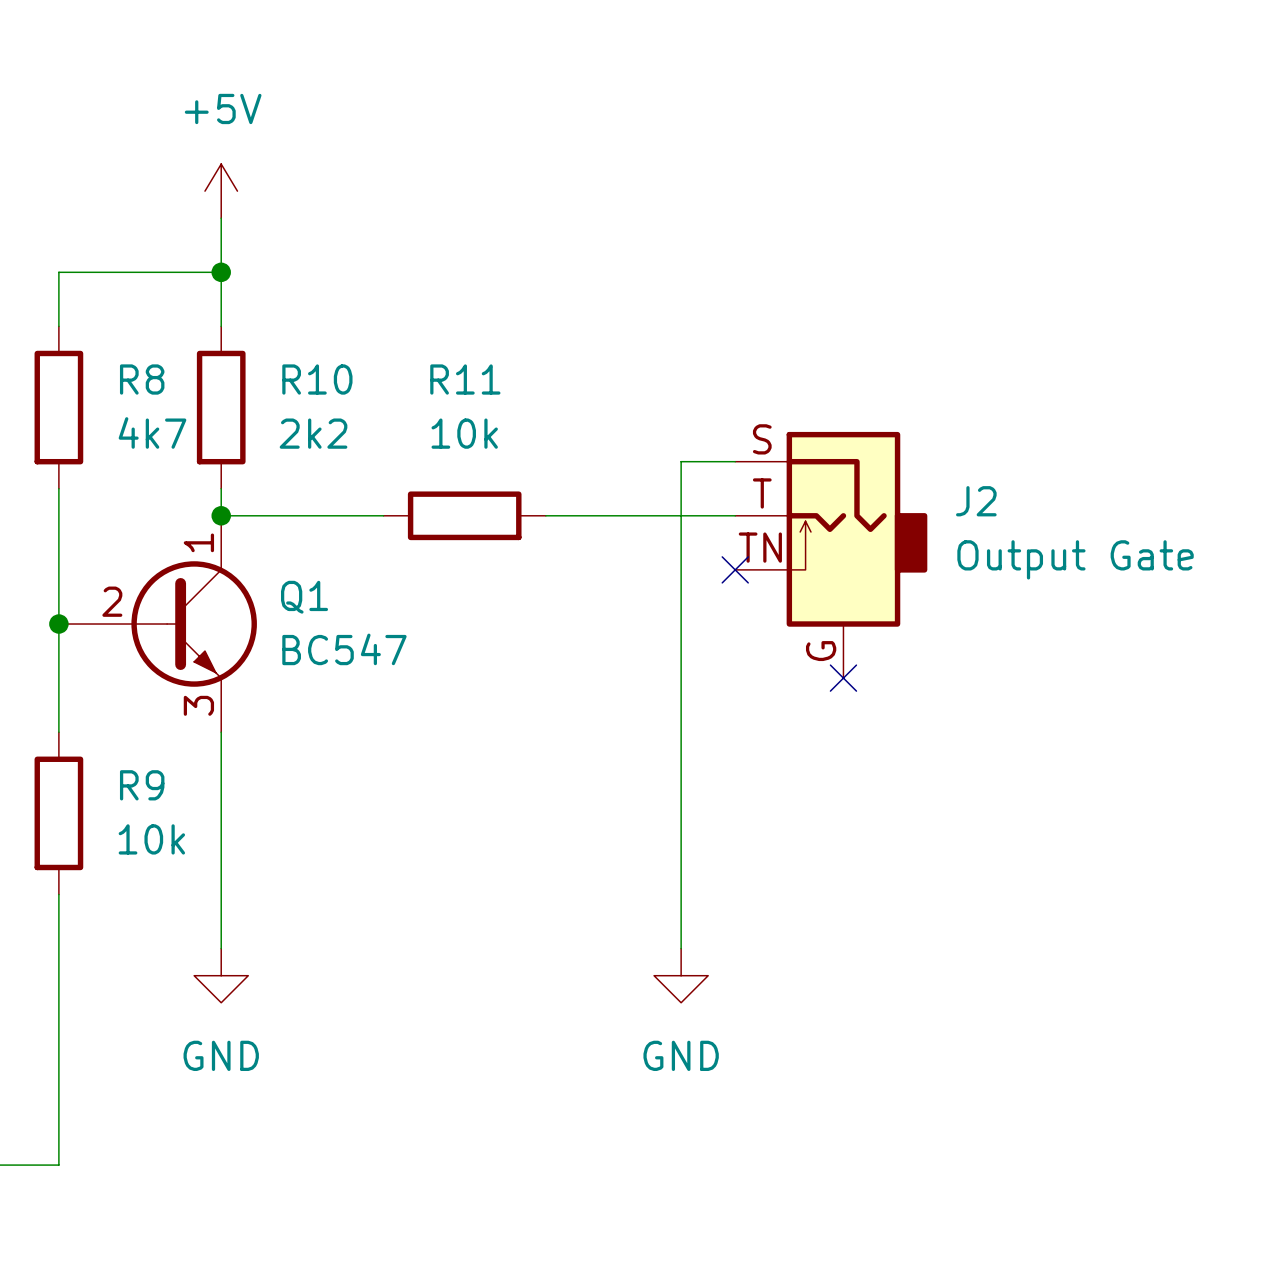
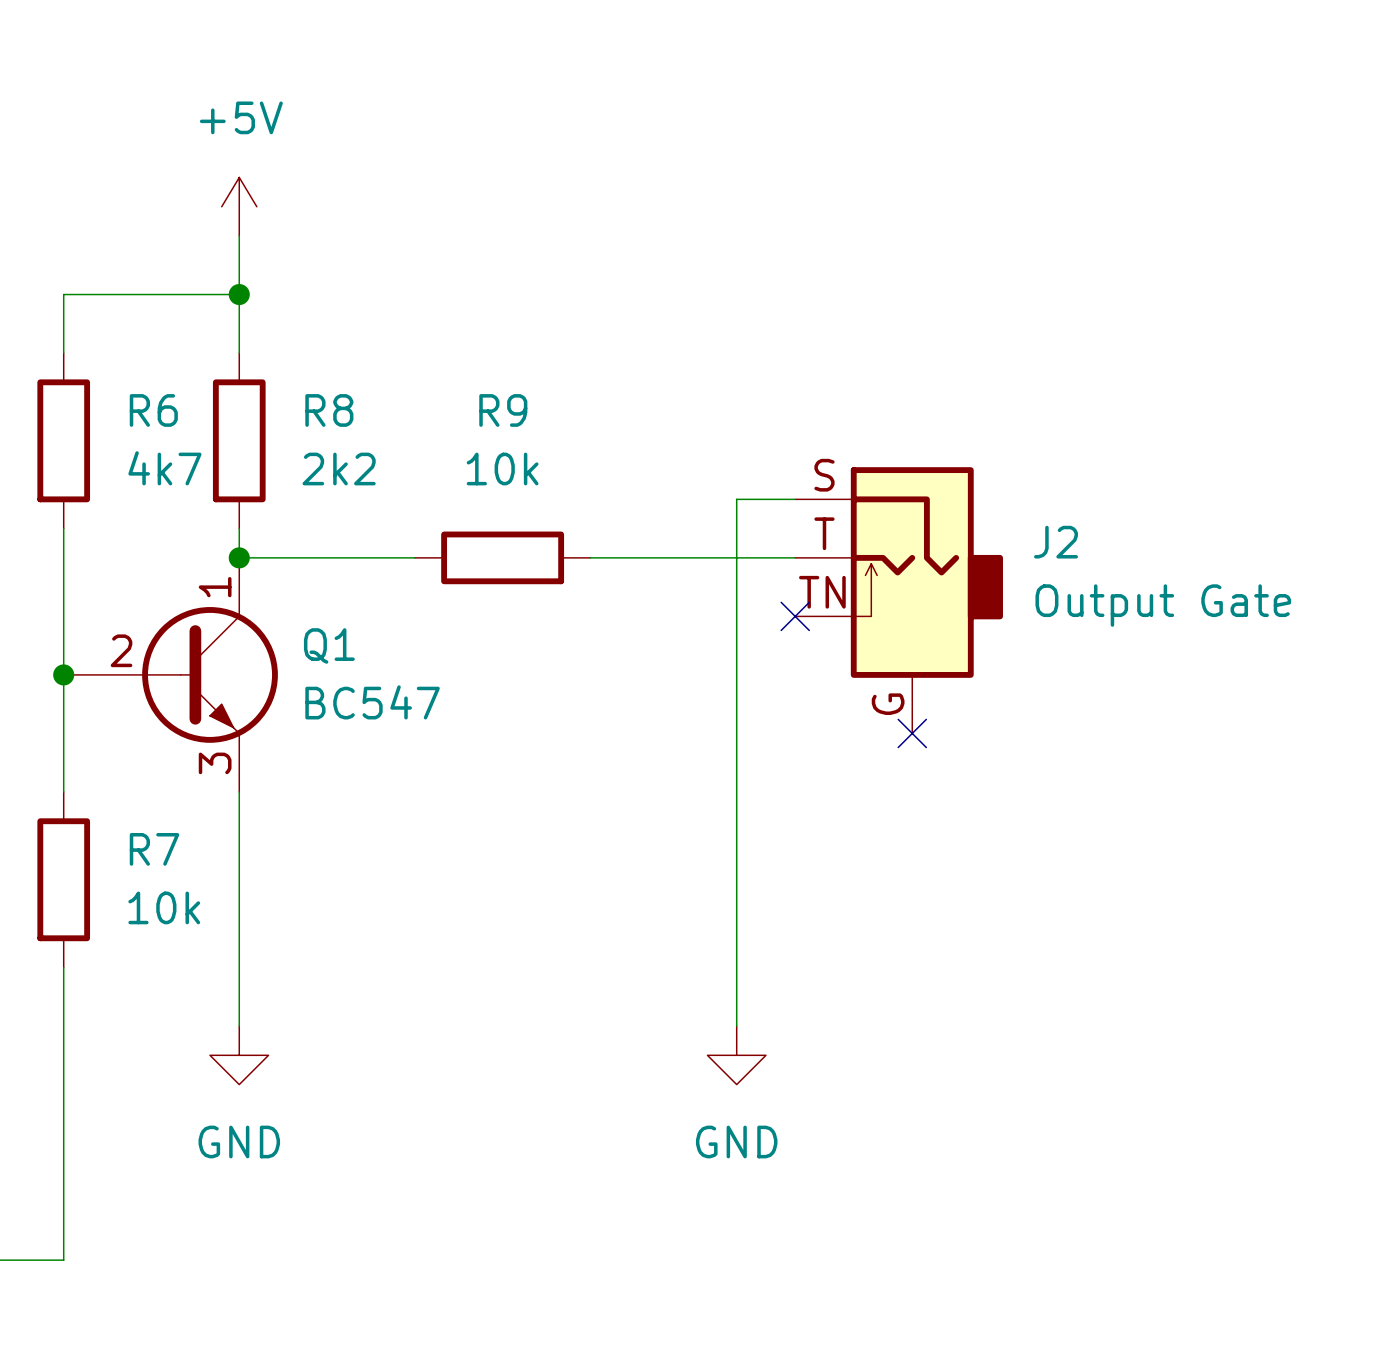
R8 name: R8 (142, 379) -> R6 (153, 410)
R10 name: R10 (317, 379) -> R8 (329, 410)
R11 name: R11 (465, 379) -> R9 (503, 410)
R9 name: R9 (142, 785) -> R7 (154, 849)

